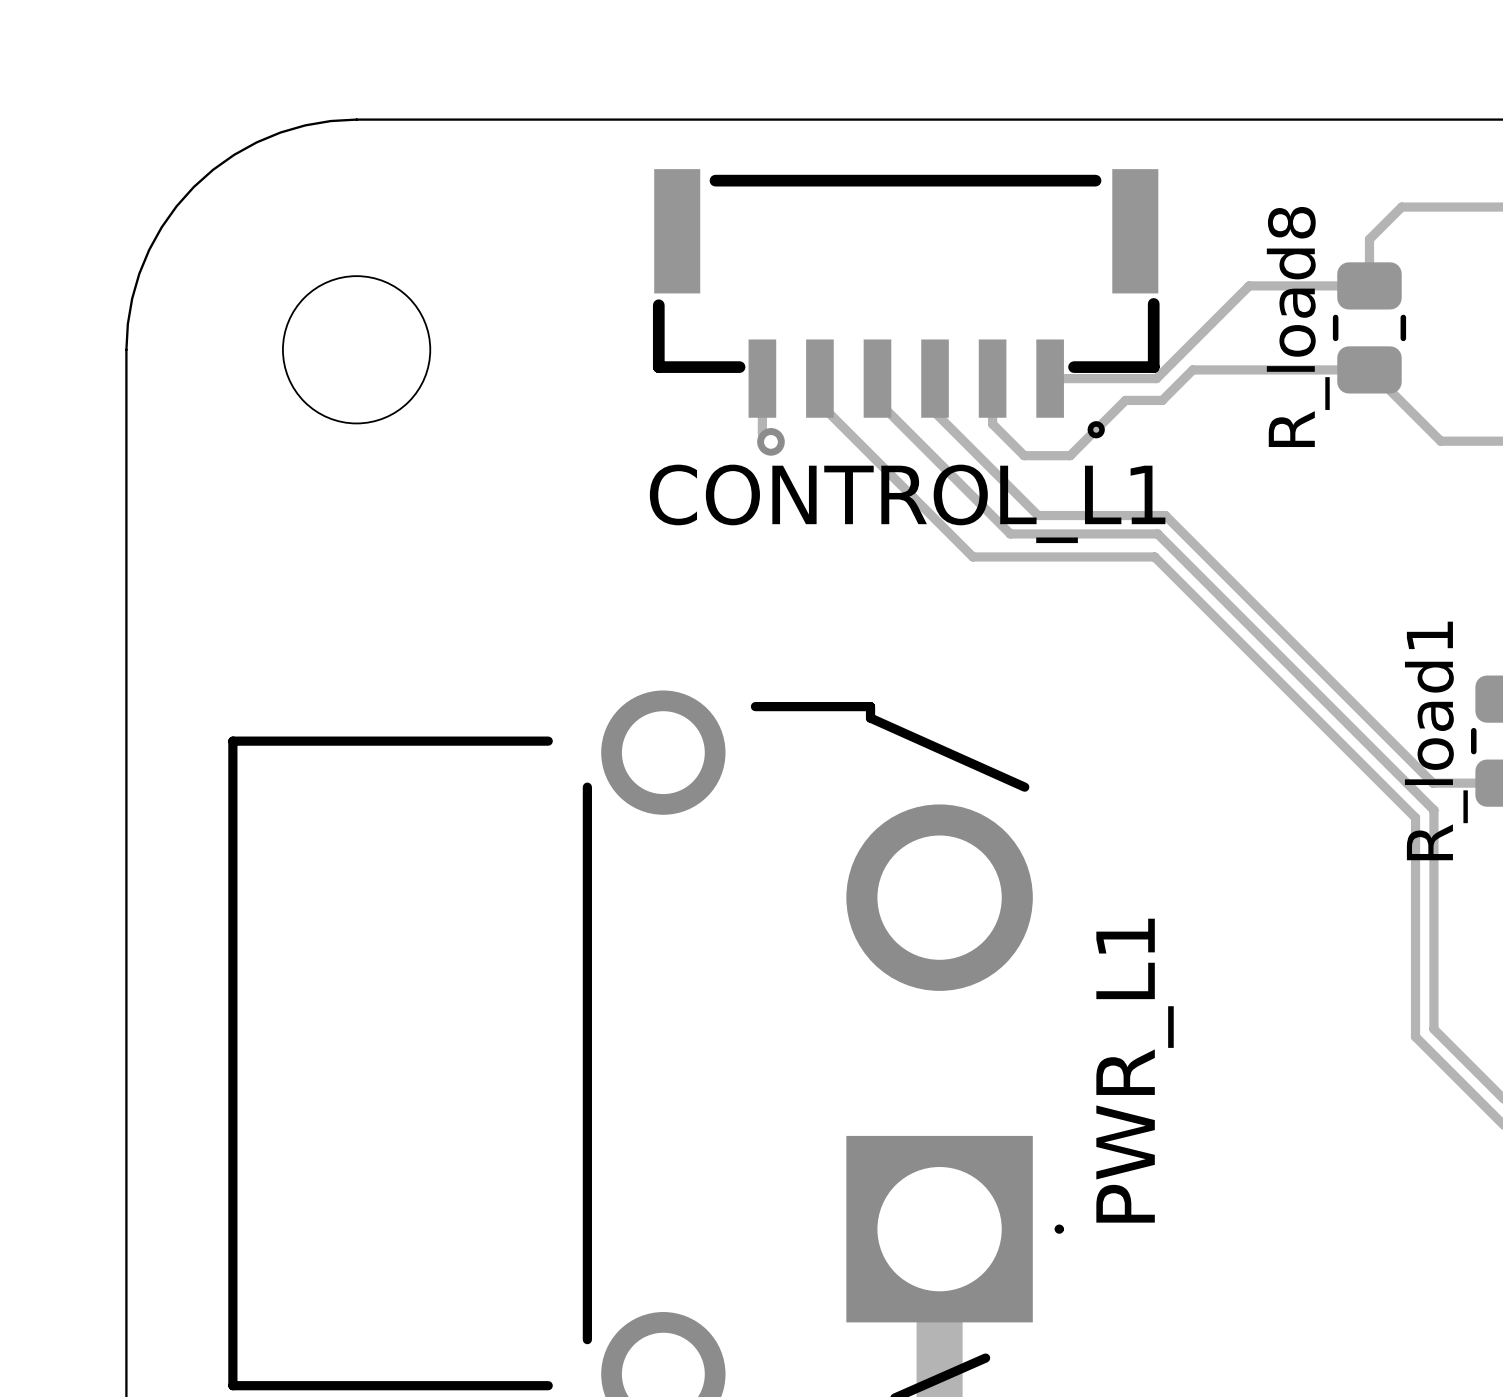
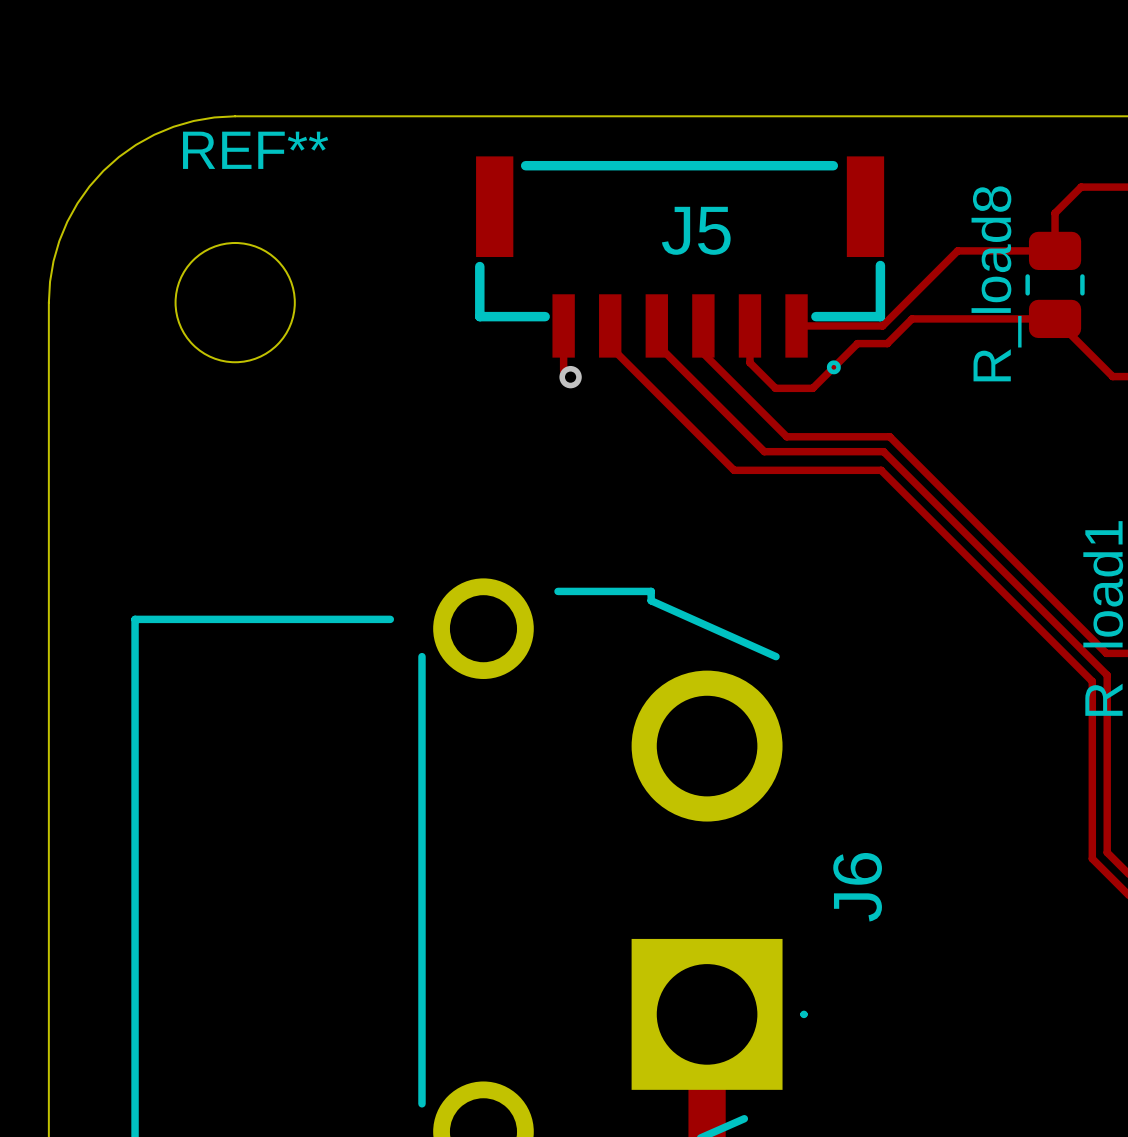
REF** name: none -> REF** (255, 150)
CONTROL_L1 name: CONTROL_L1 (907, 503) -> J5 (696, 230)
PWR_L1 name: PWR_L1 (1135, 1070) -> J6 (857, 887)

